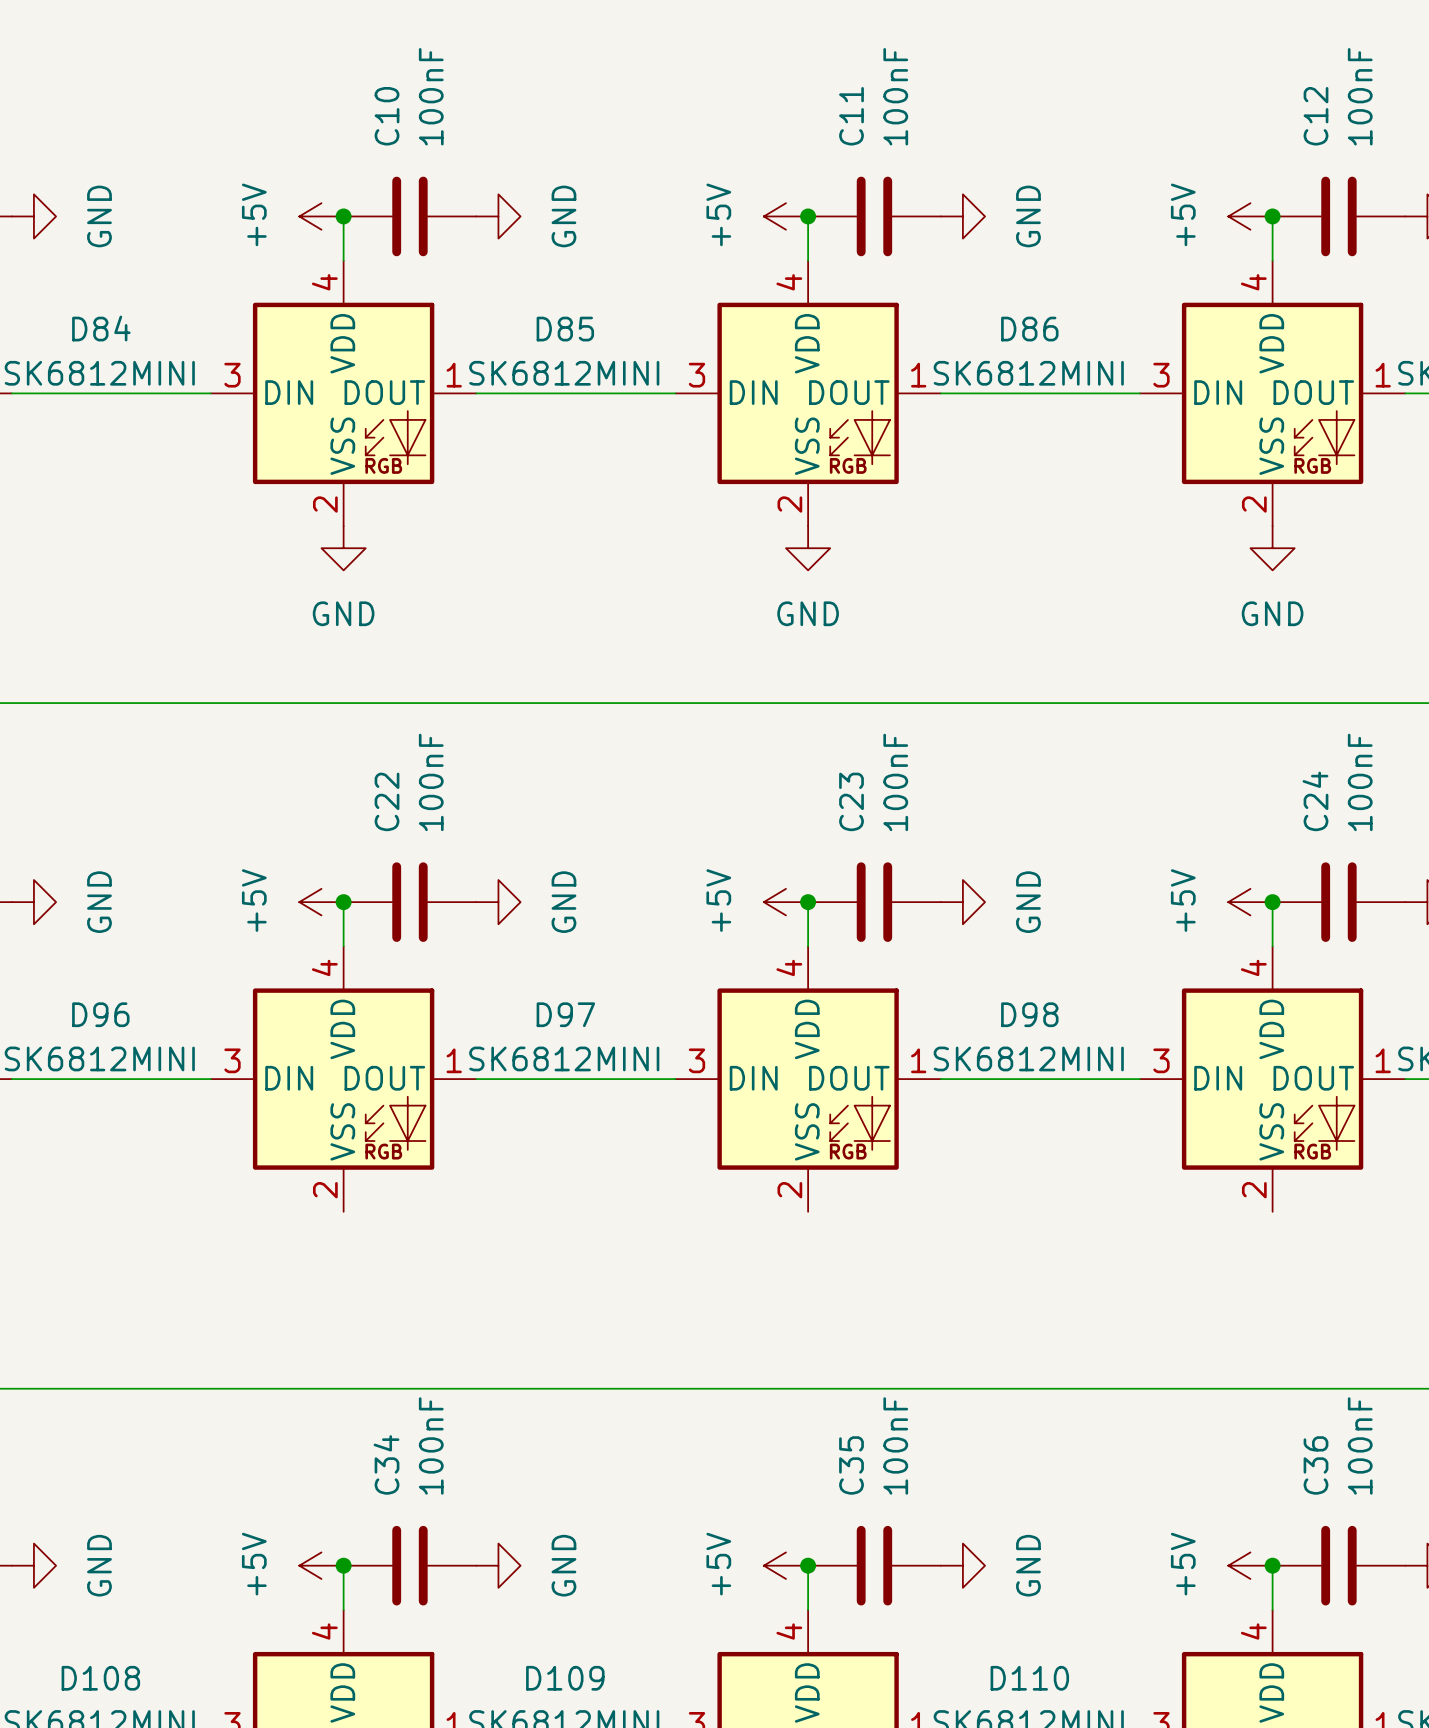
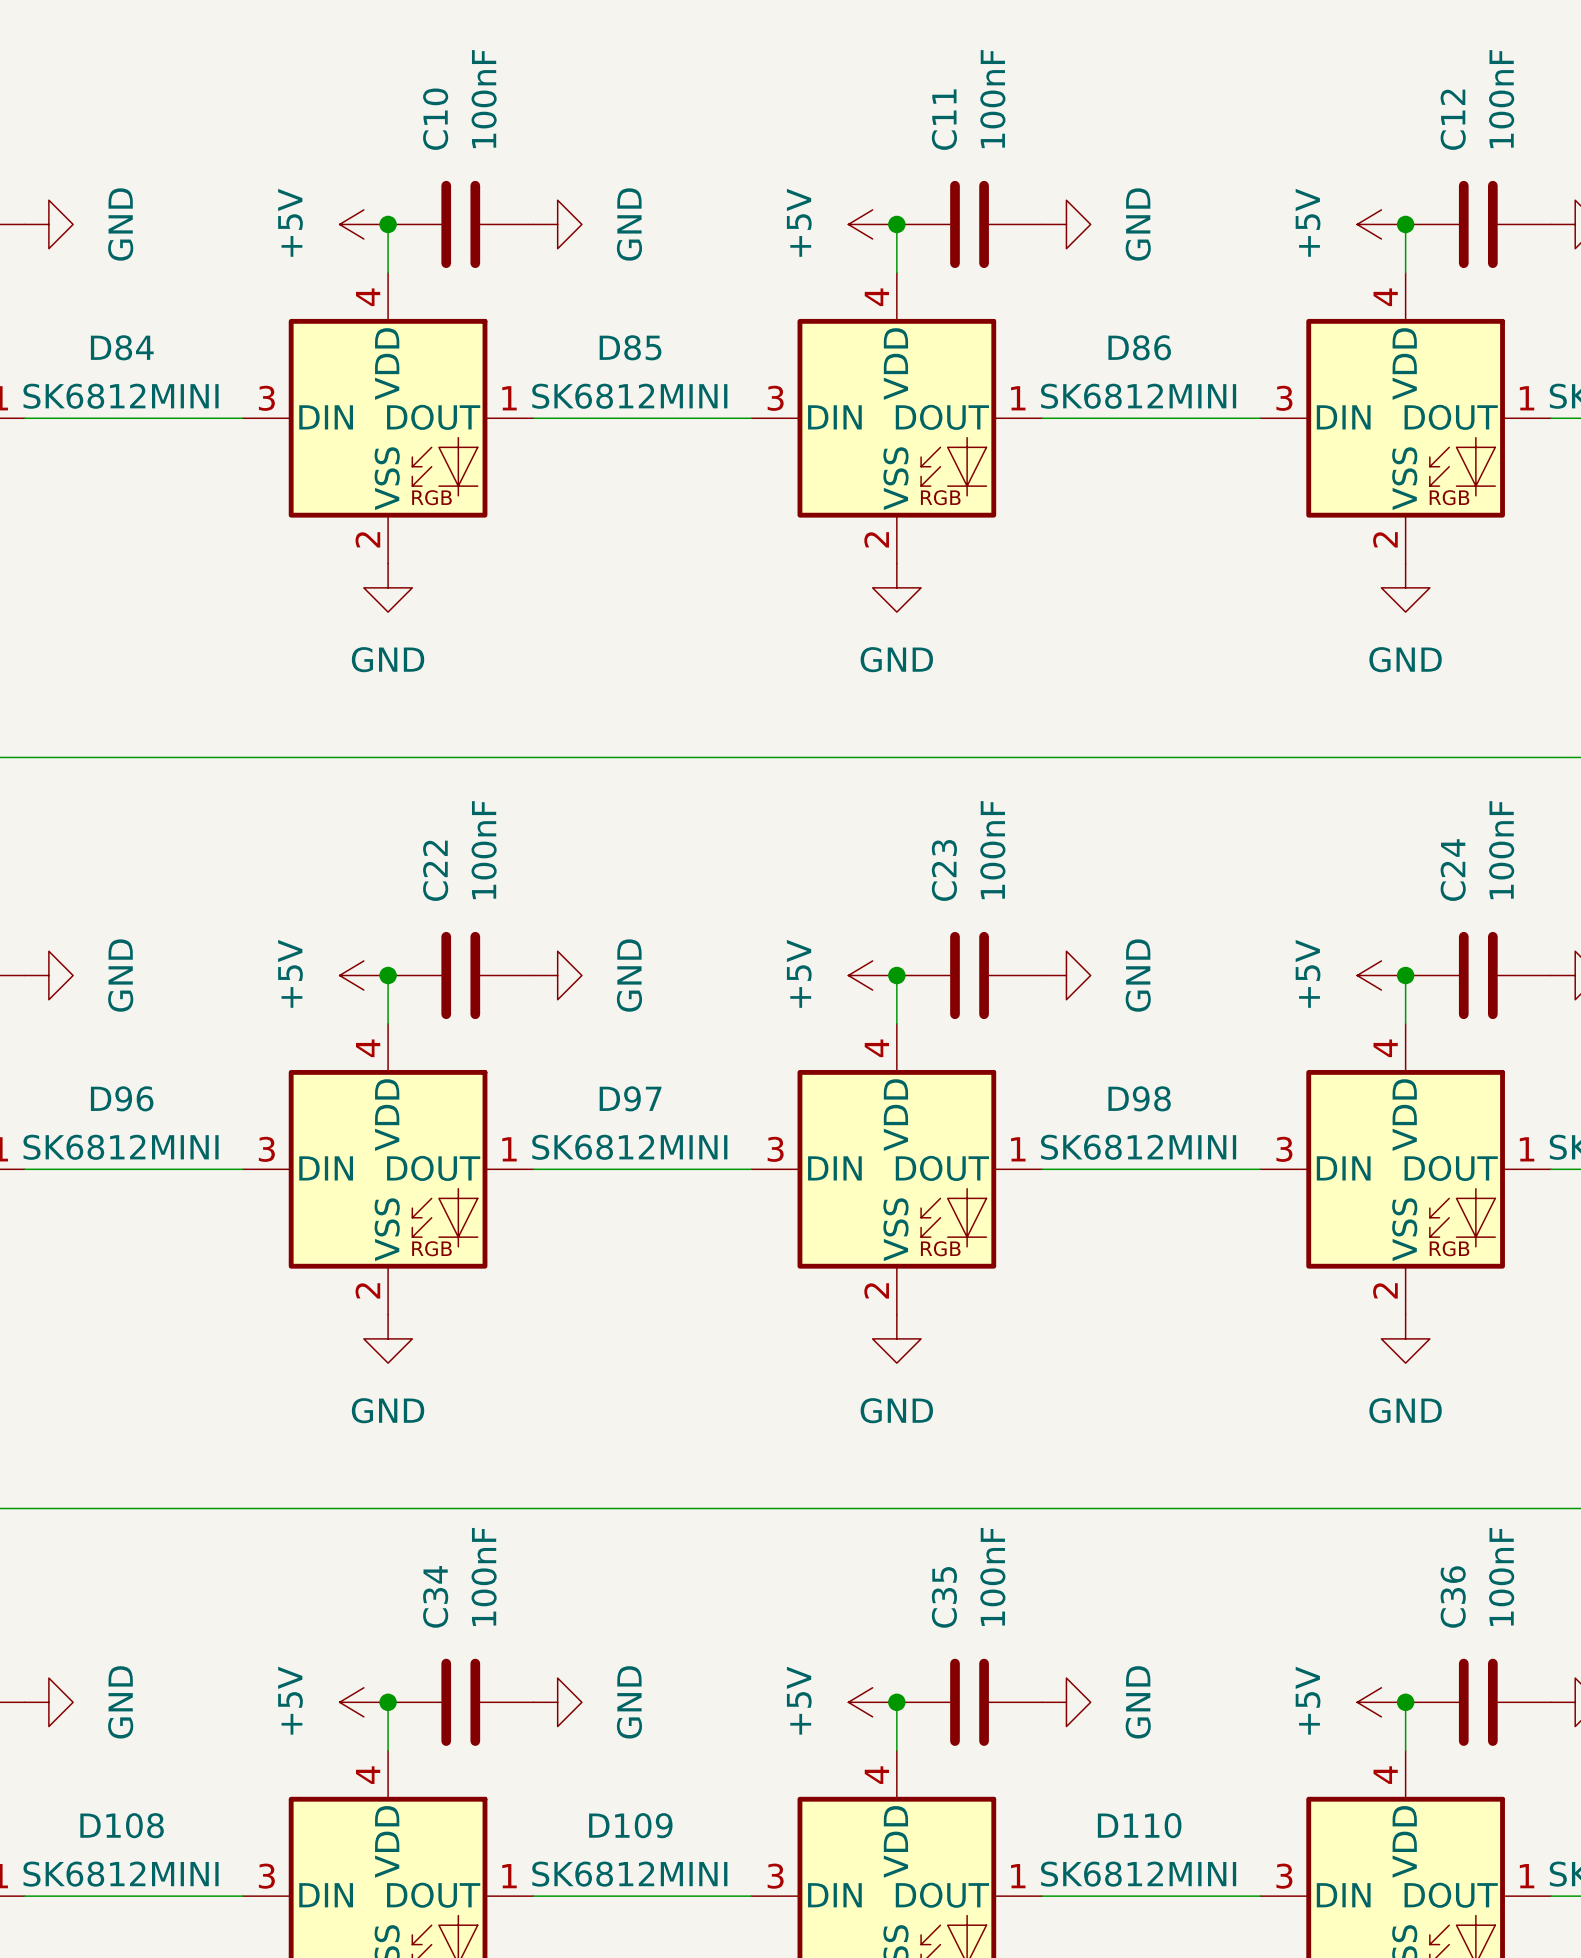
power symbol: none -> GND (388, 1338)
power symbol: none -> GND (896, 1338)
power symbol: none -> GND (1405, 1338)

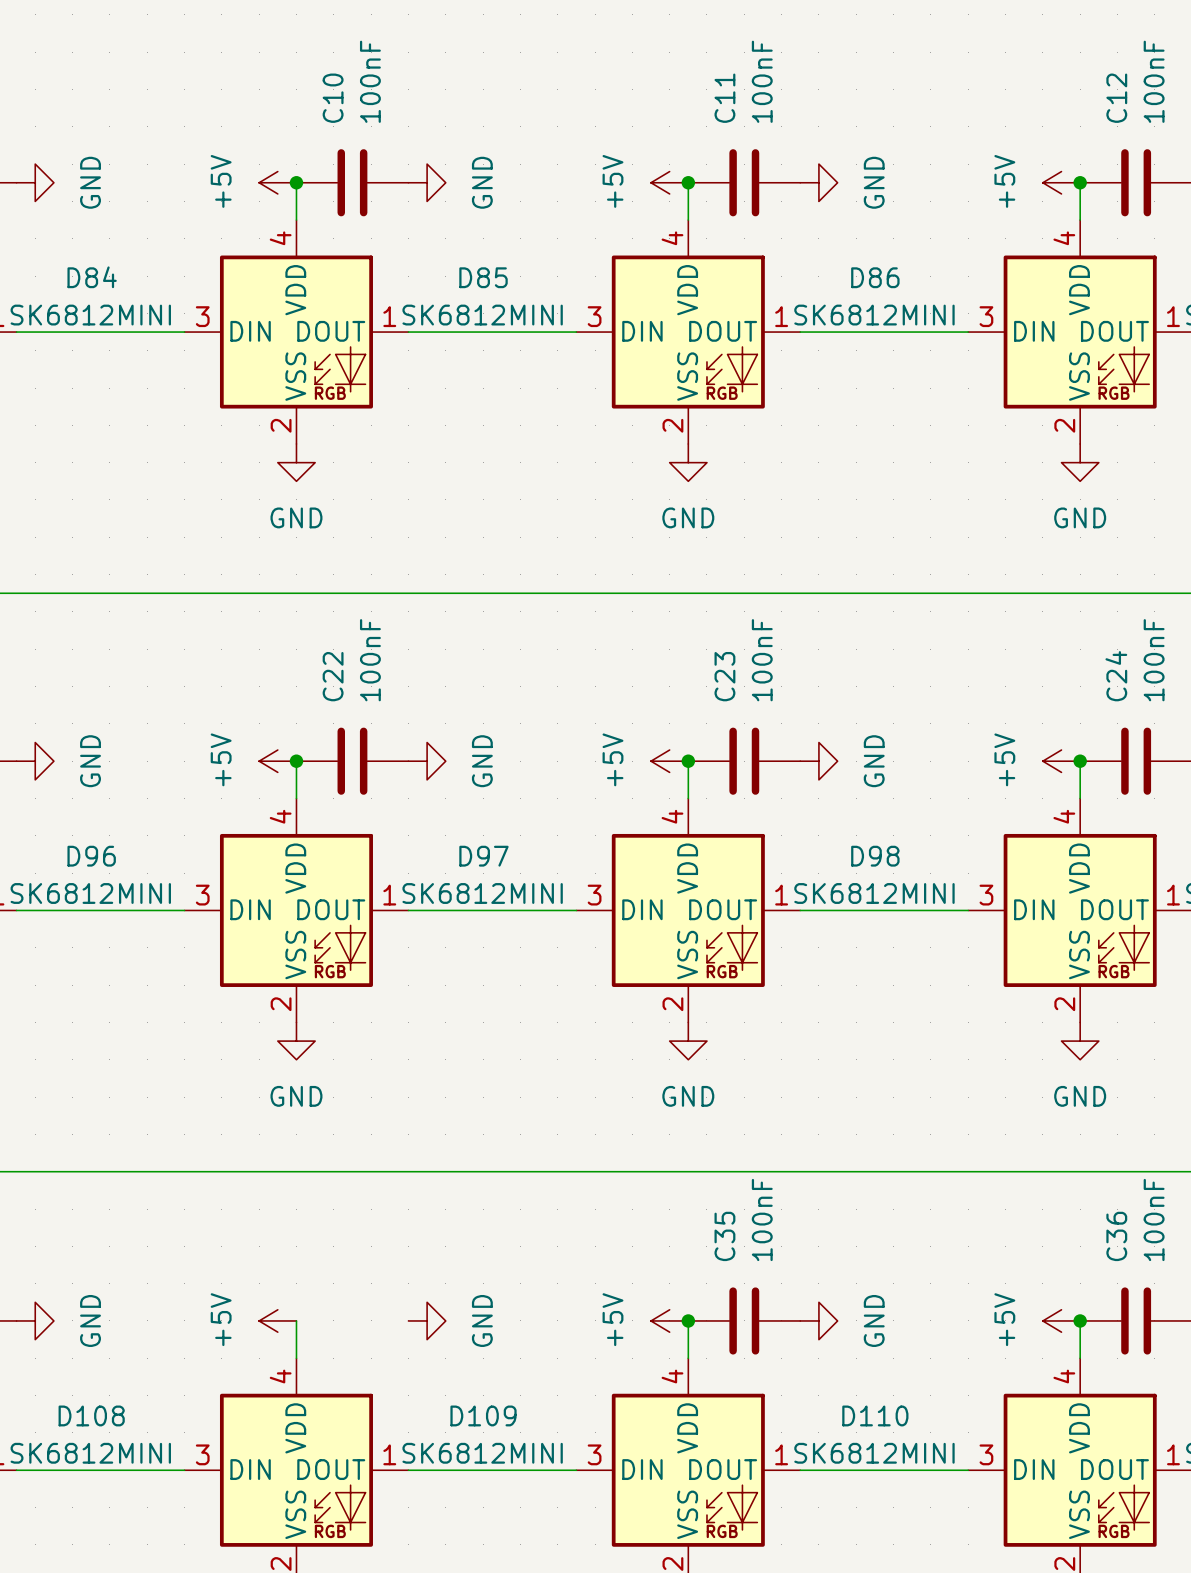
junction: (388, 1702) -> none
C34: 100nF (460, 1702) -> none

